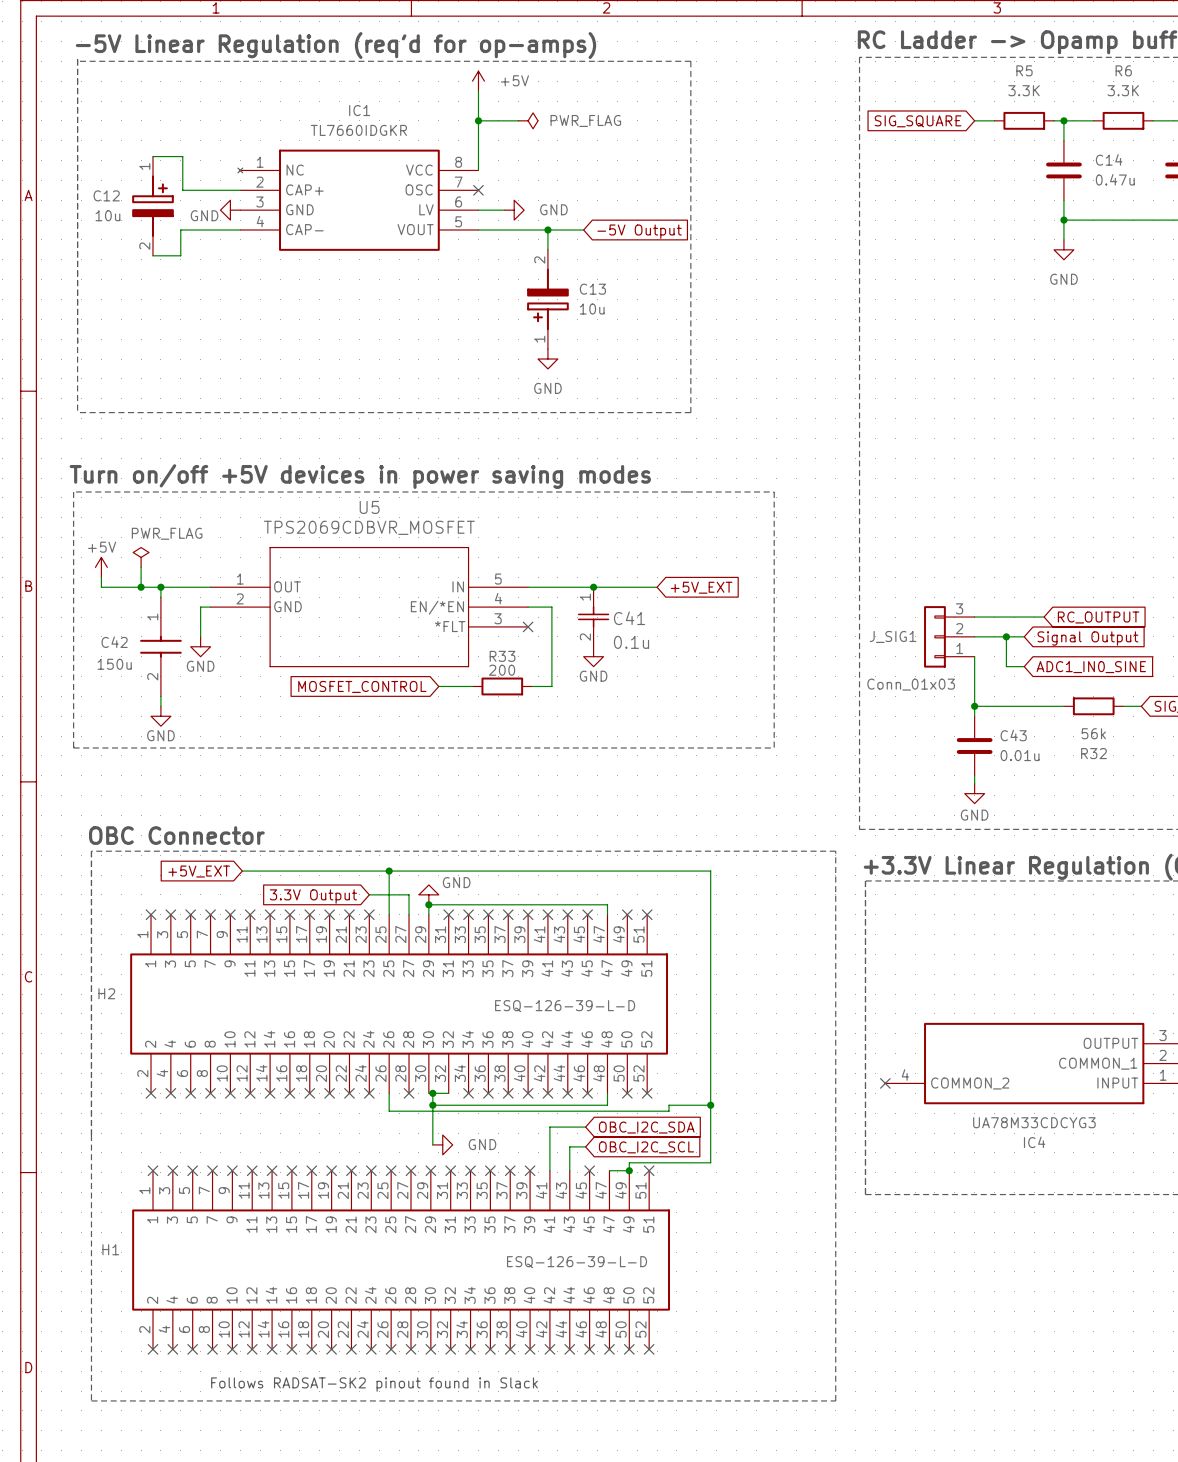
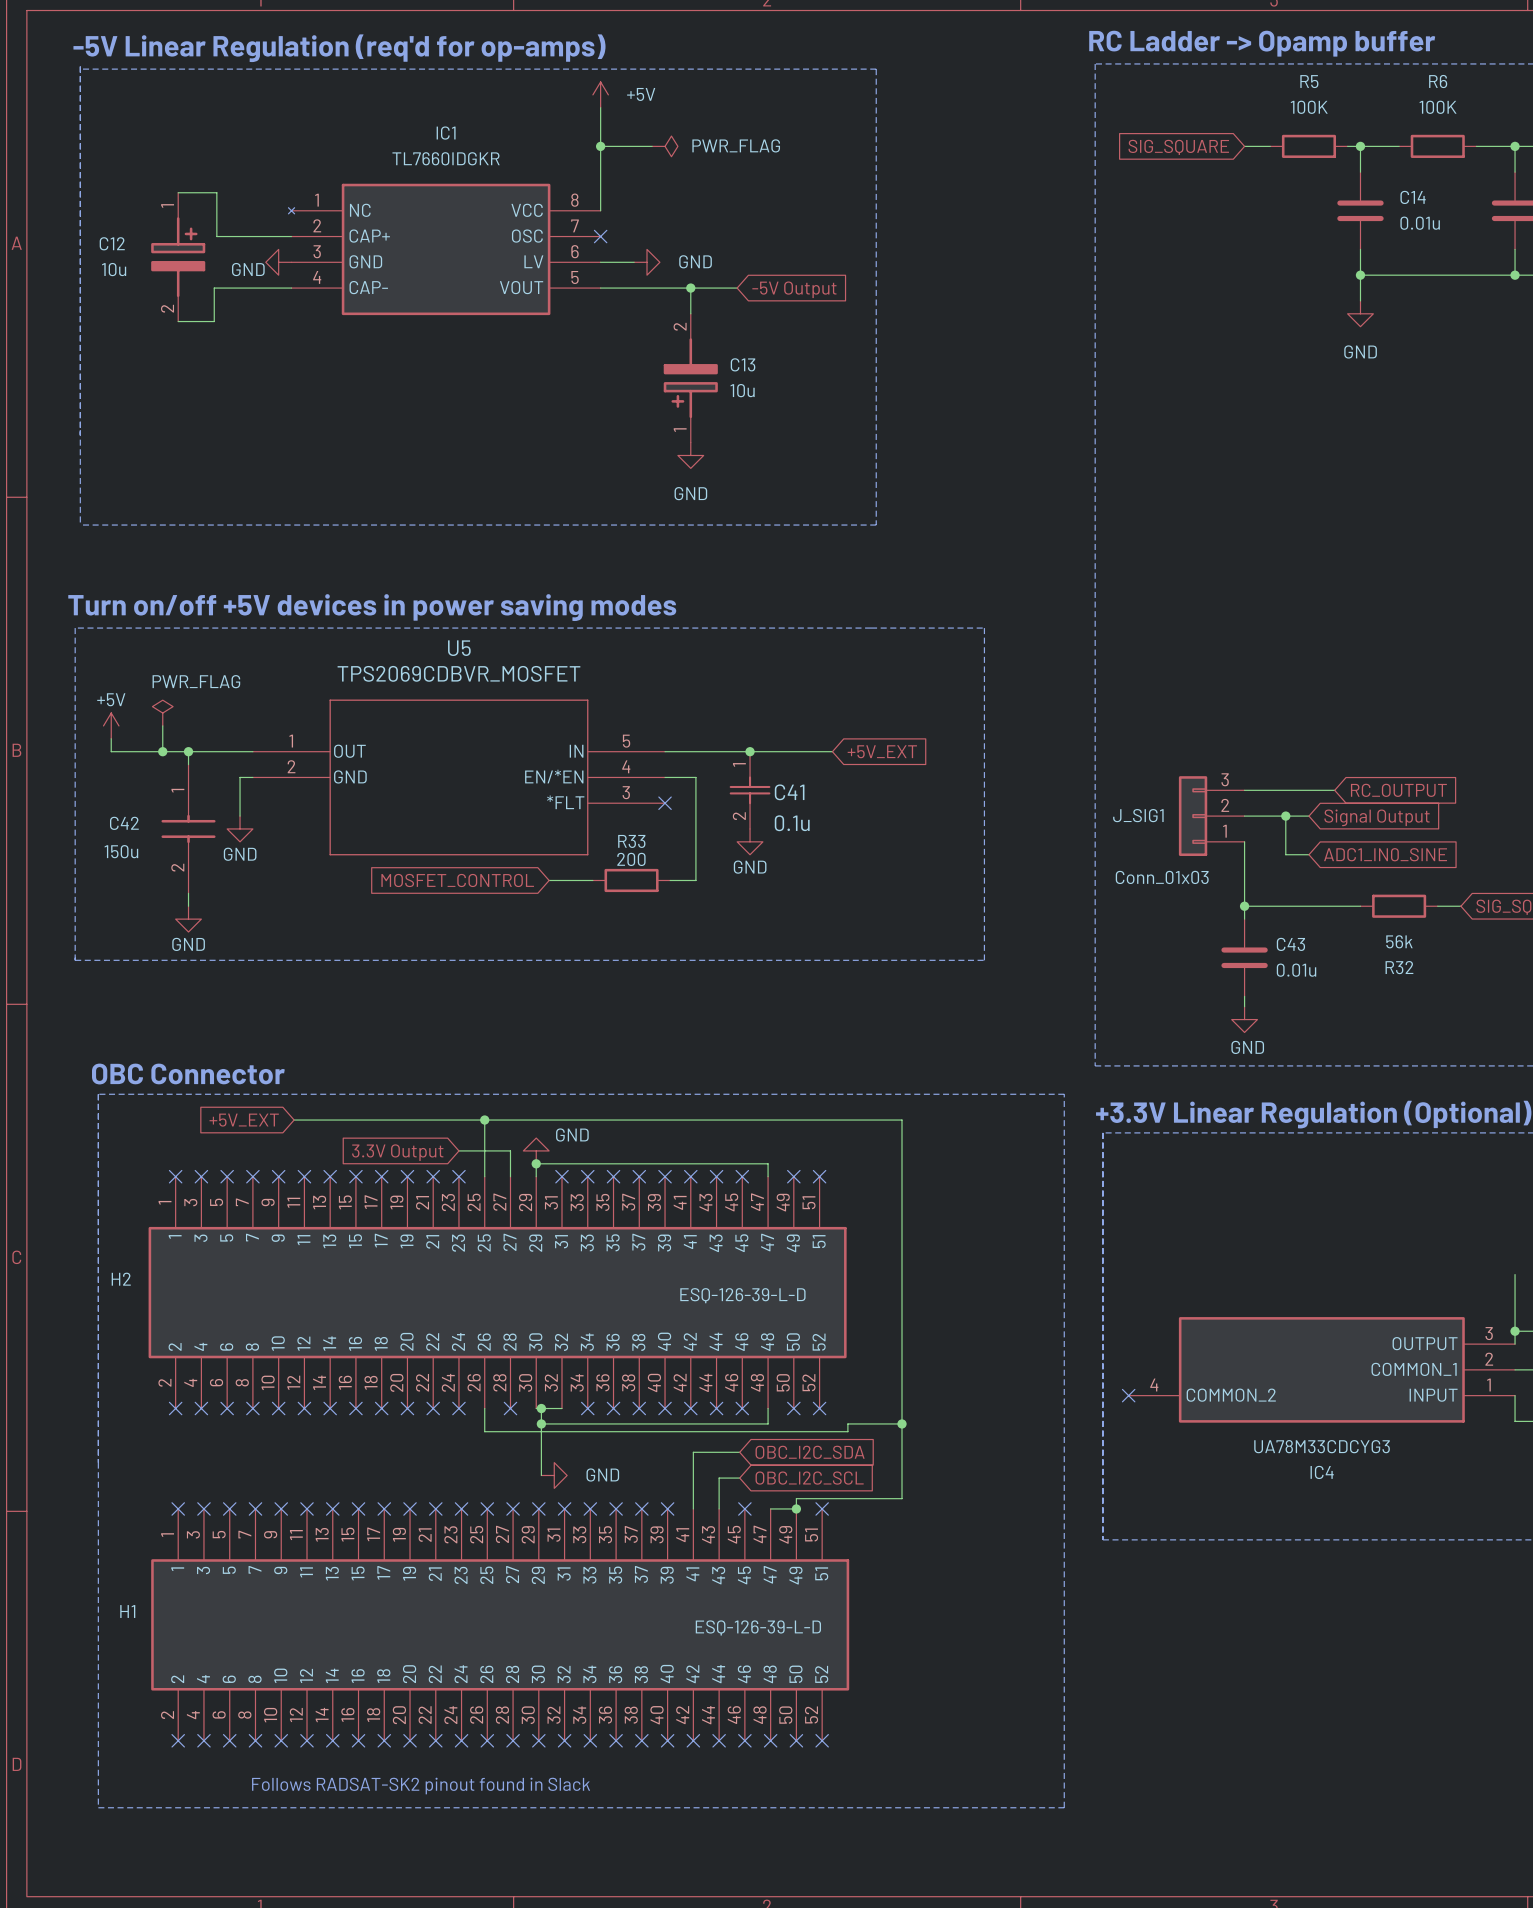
R5 value: 3.3K (1024, 90) -> 100K (1309, 107)
R6 value: 3.3K (1123, 90) -> 100K (1438, 107)
C14 value: 0.47u (1115, 179) -> 0.01u (1420, 223)

